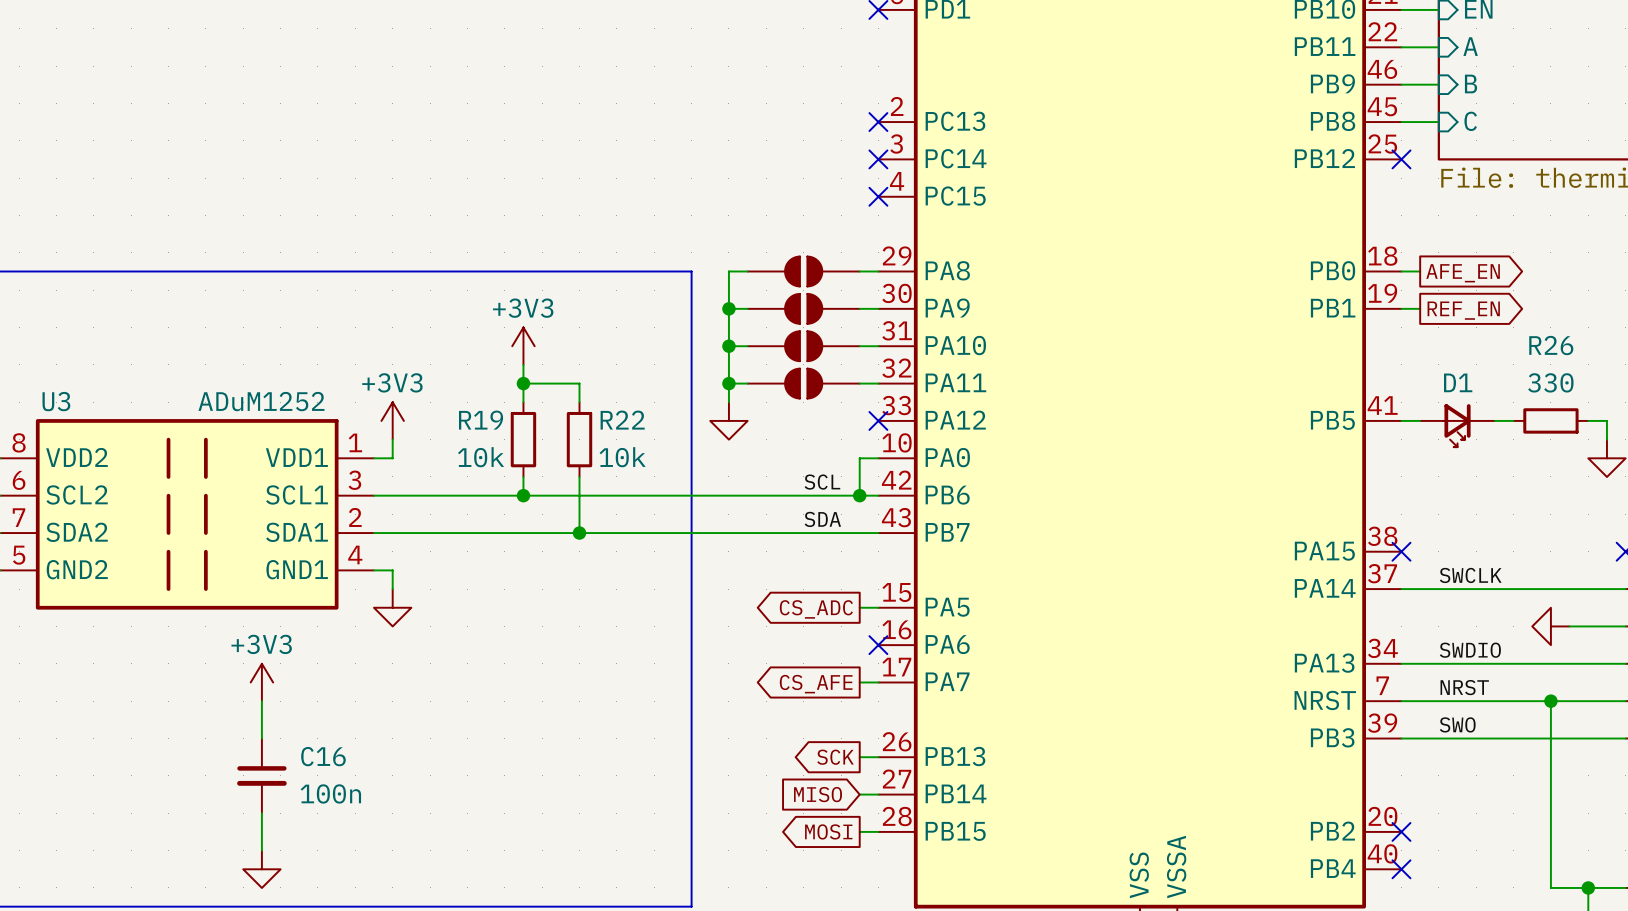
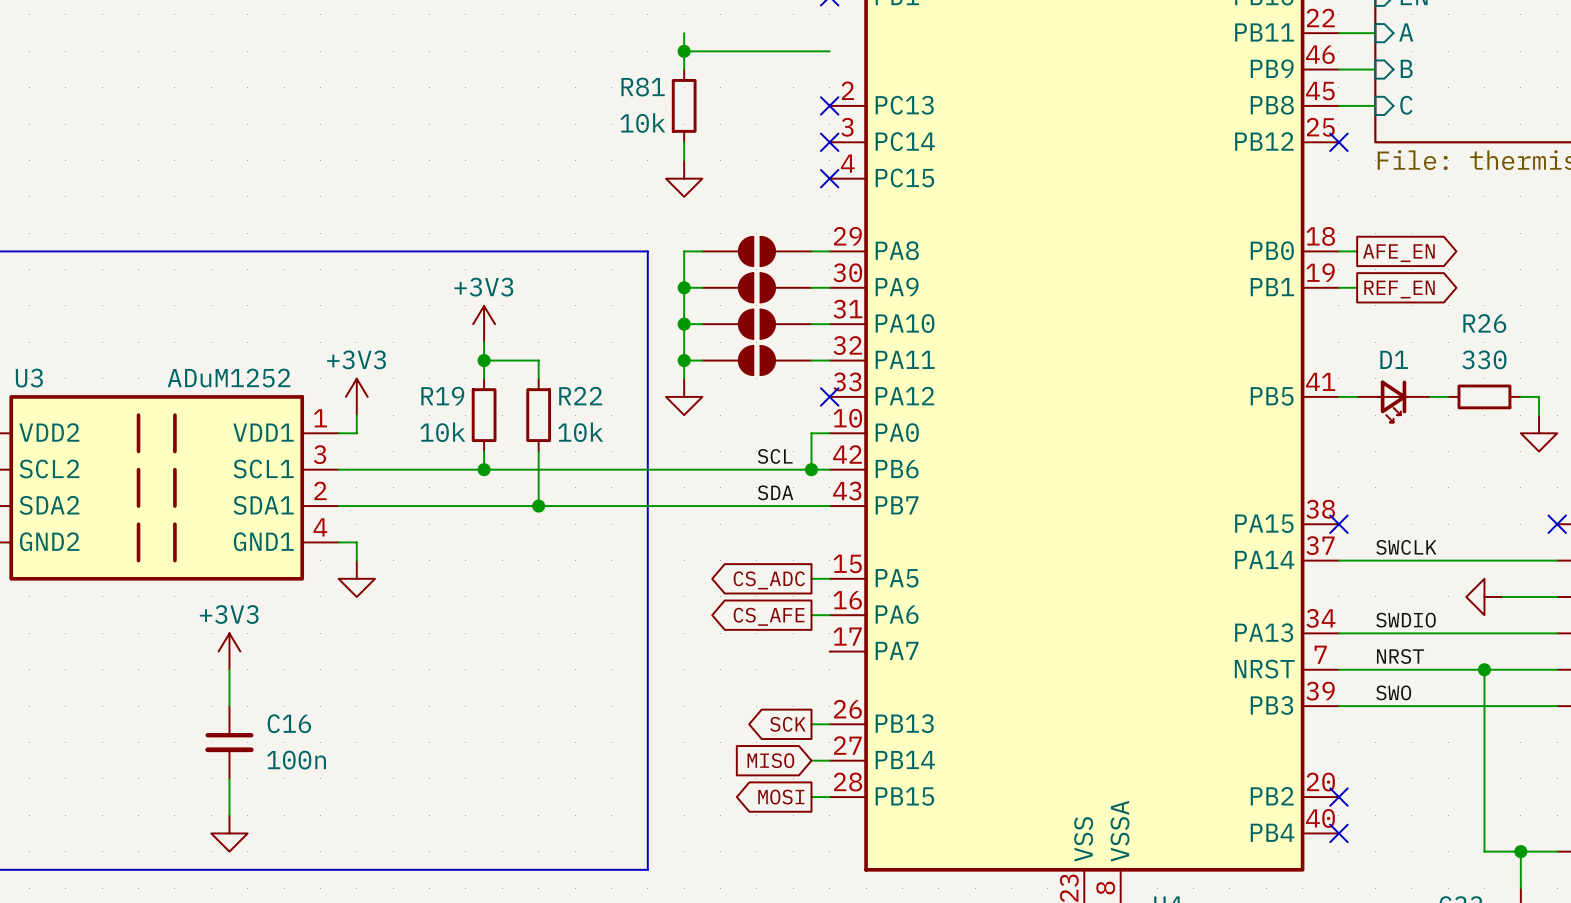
wire: none -> (684, 33) (684, 69)
wire: none -> (684, 51) (829, 51)
junction: none -> (684, 51)
R81: none -> 10k (684, 105)
wire: none -> (684, 142) (684, 160)
power symbol: none -> (684, 178)
no-connect mark: (878, 645) -> none
wire: (859, 682) (878, 682) -> (811, 615) (829, 615)
global label position: CS_AFE (816, 684) -> CS_AFE (769, 616)

